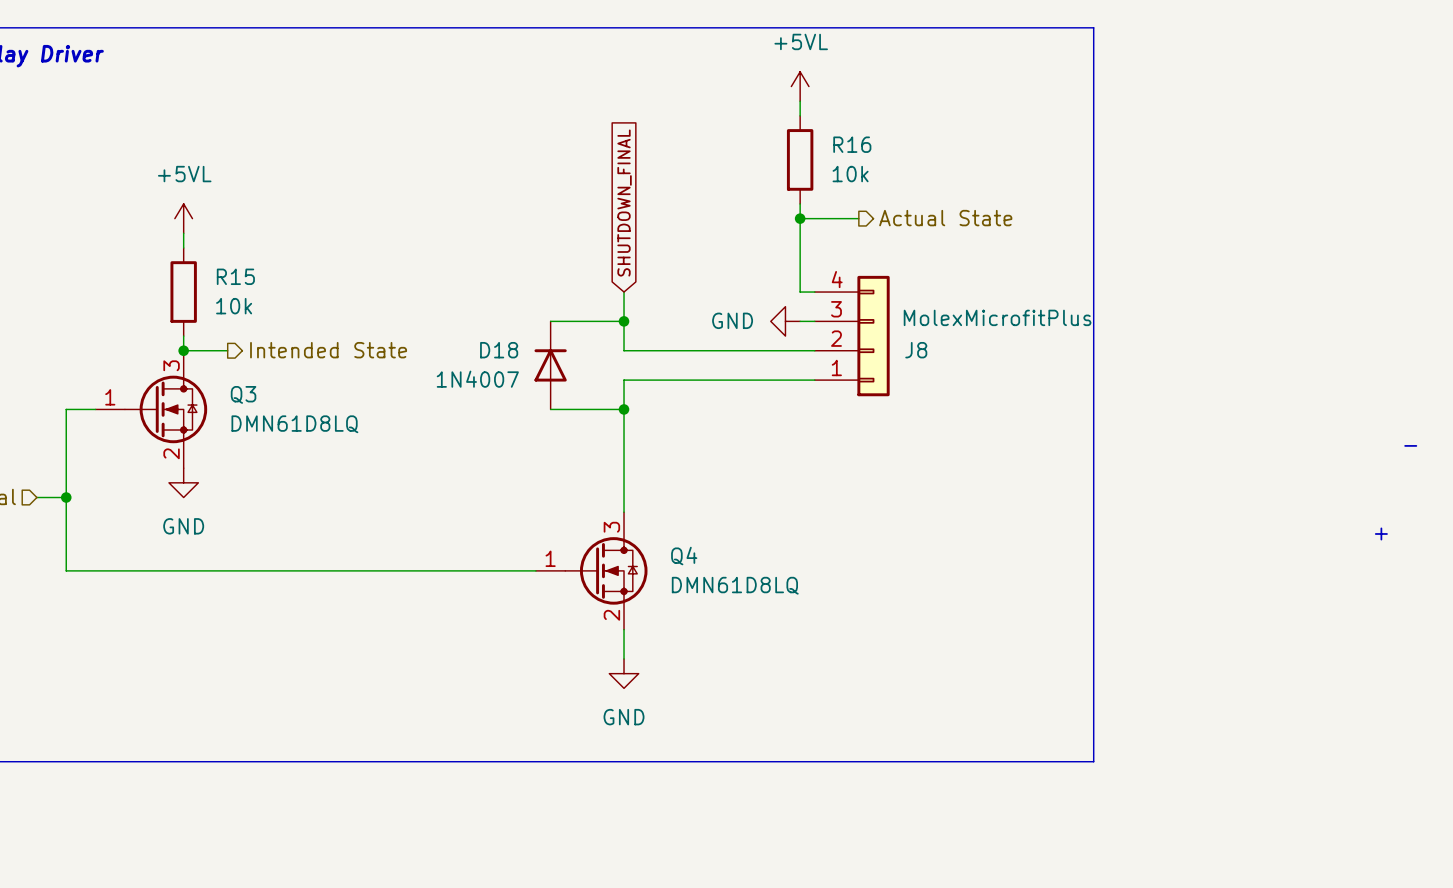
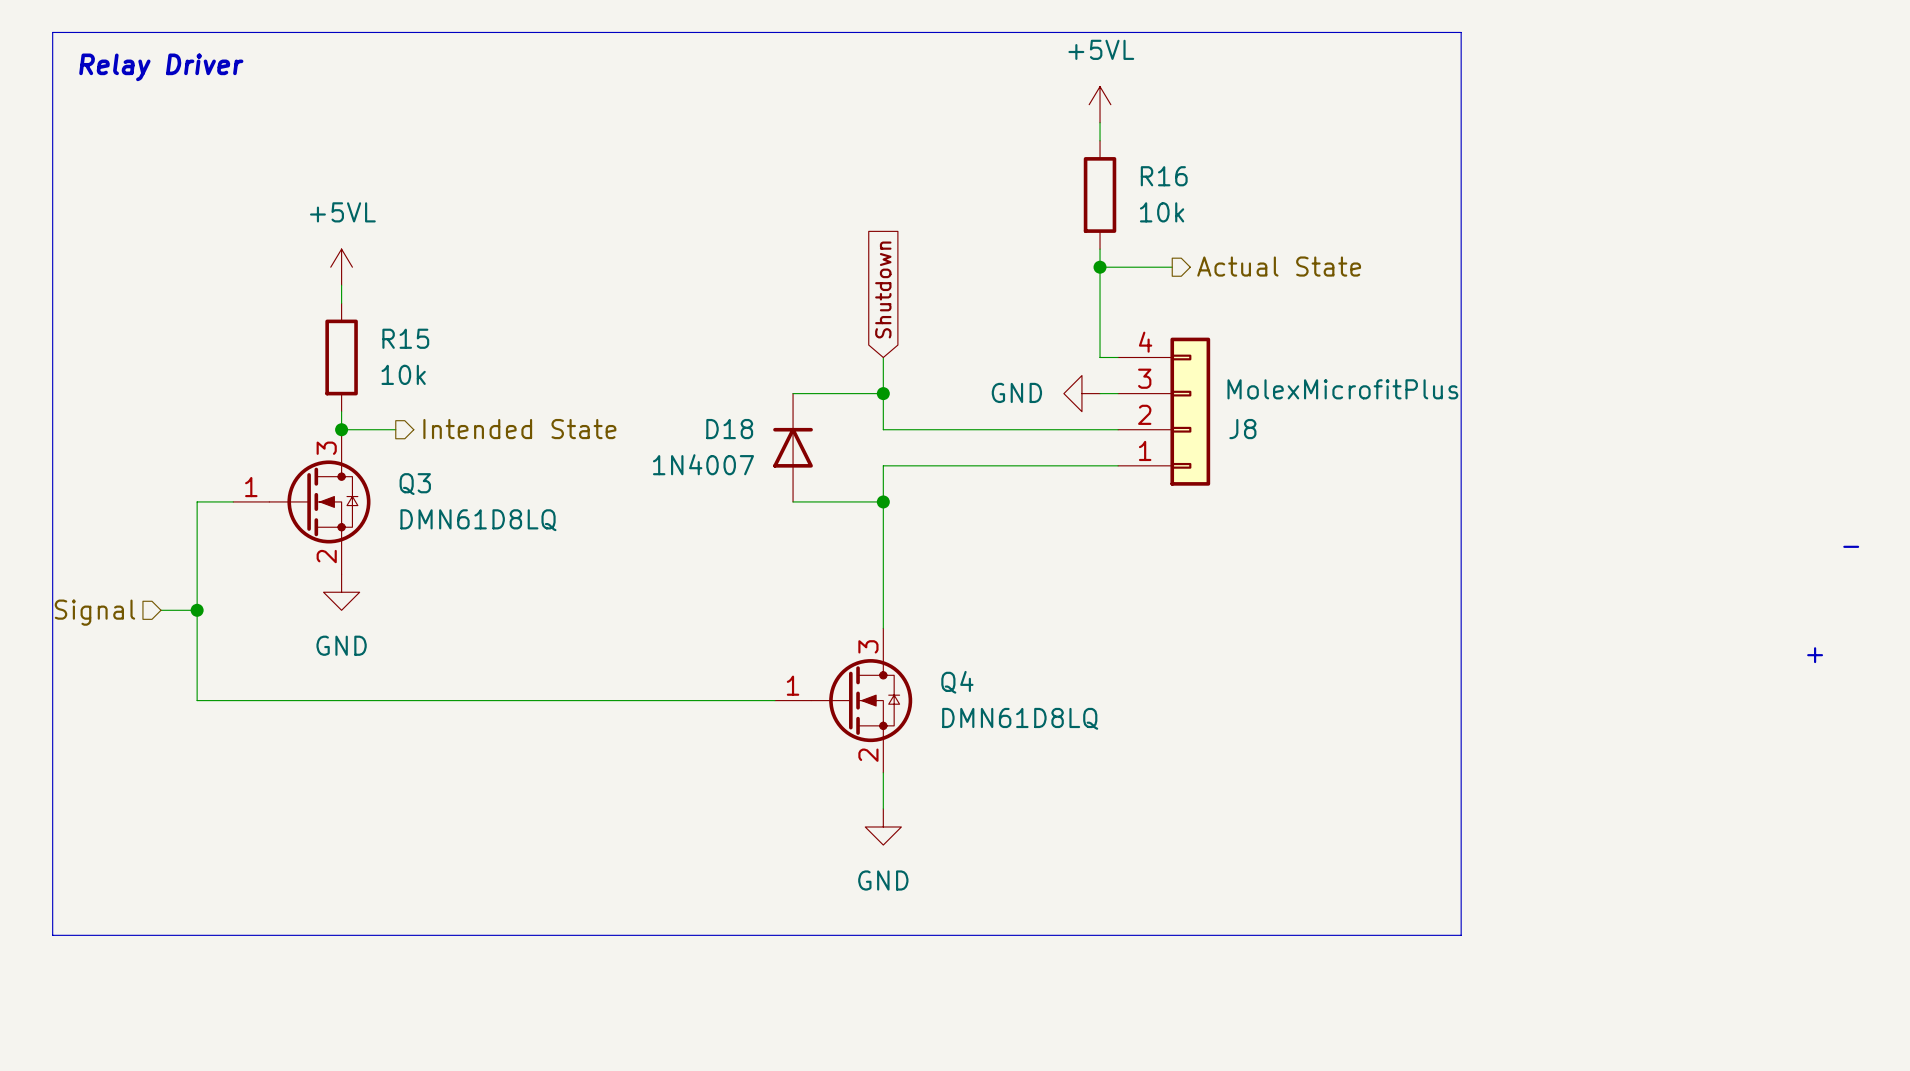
global label: SHUTDOWN_FINAL (624, 203) -> Shutdown (883, 289)

